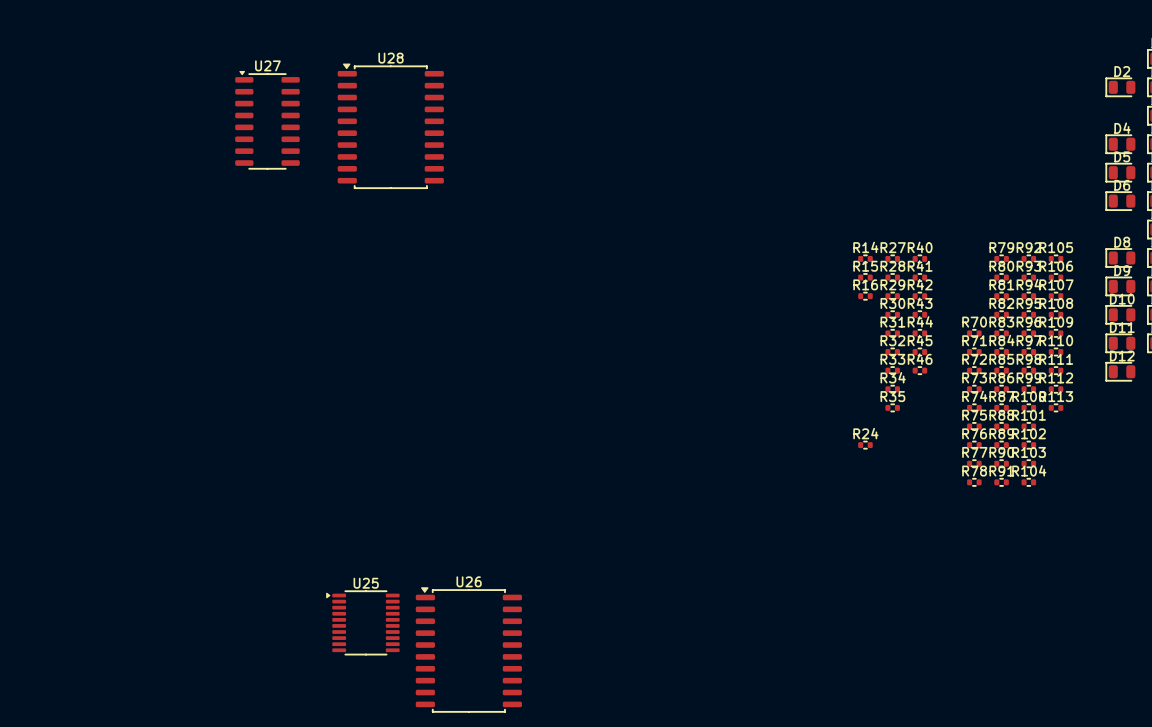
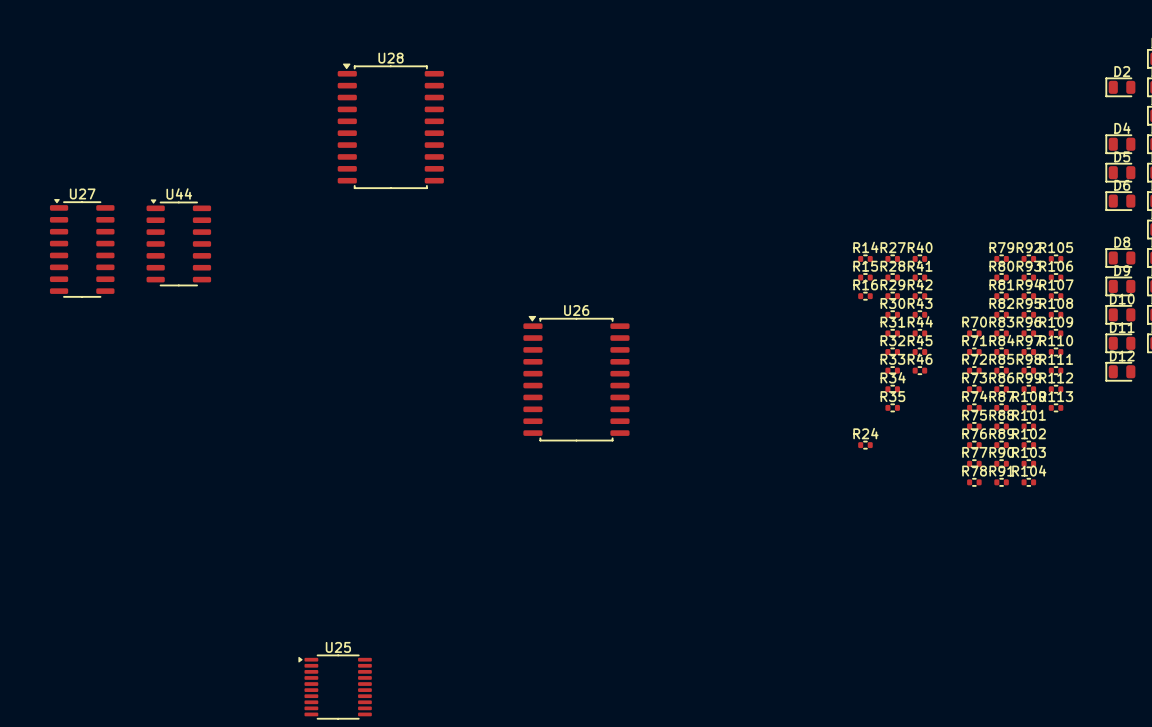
U27 position: (267, 120) -> (82, 248)
U44: none -> (178, 242)
U25 position: (362, 622) -> (335, 687)
U26 position: (468, 649) -> (576, 378)

